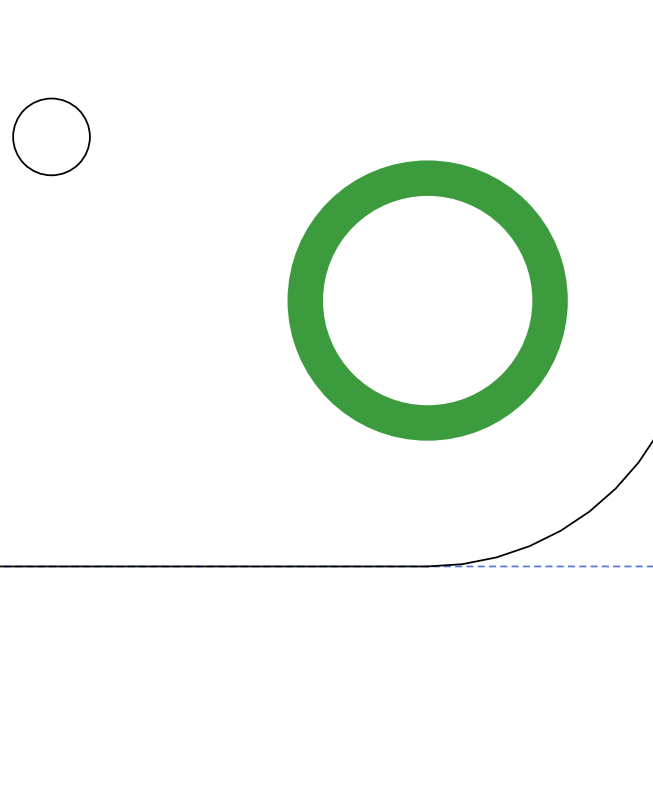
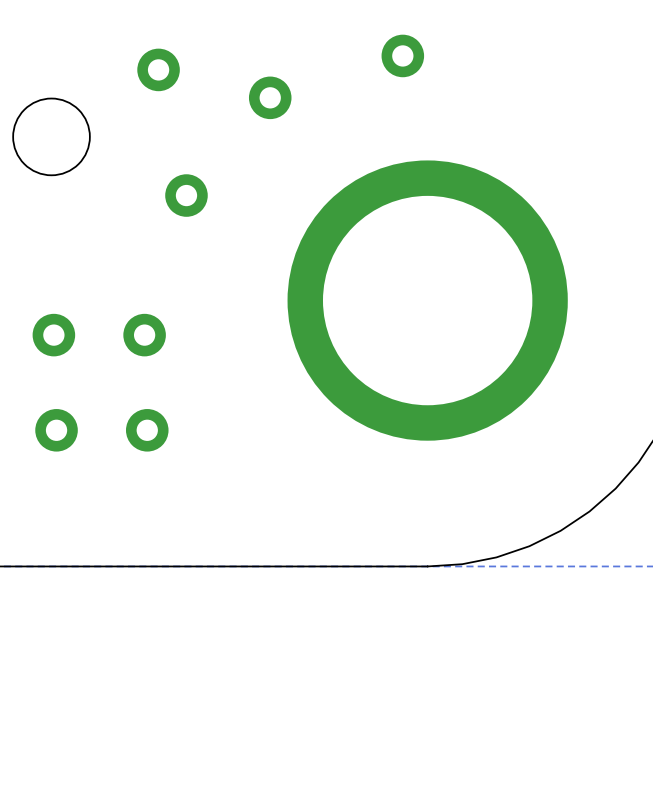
via: none -> (402, 55)
via: none -> (158, 69)
via: none -> (270, 97)
via: none -> (186, 195)
via: none -> (53, 335)
via: none -> (144, 335)
via: none -> (56, 430)
via: none -> (147, 430)

